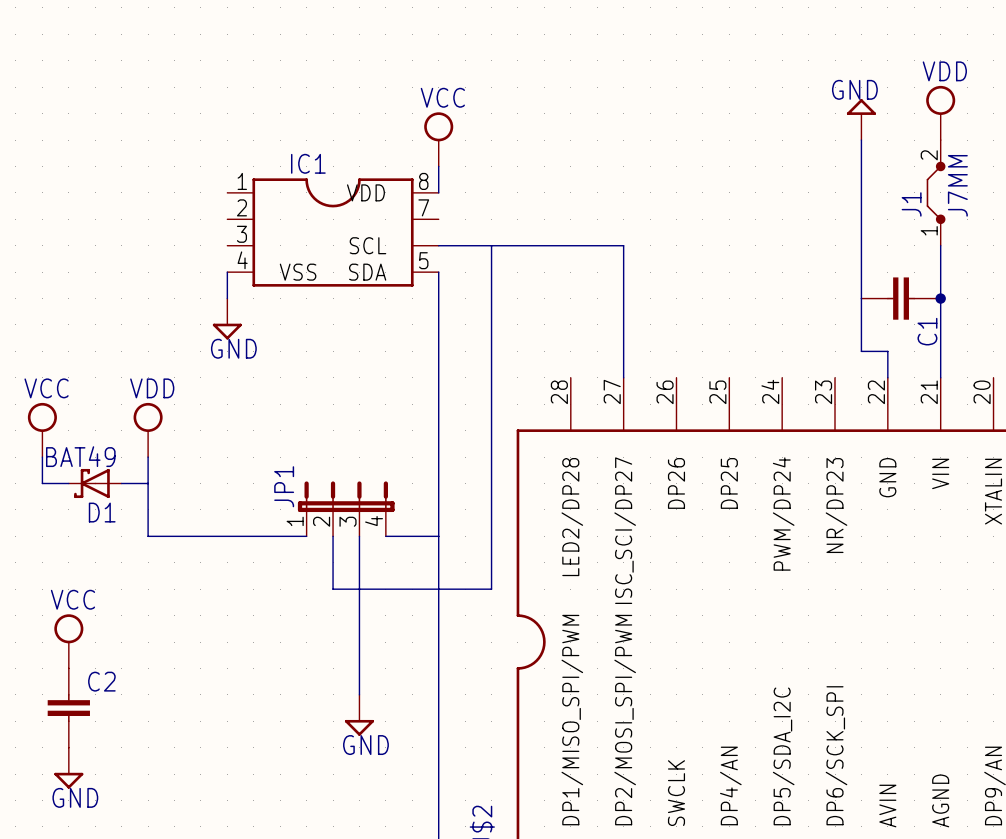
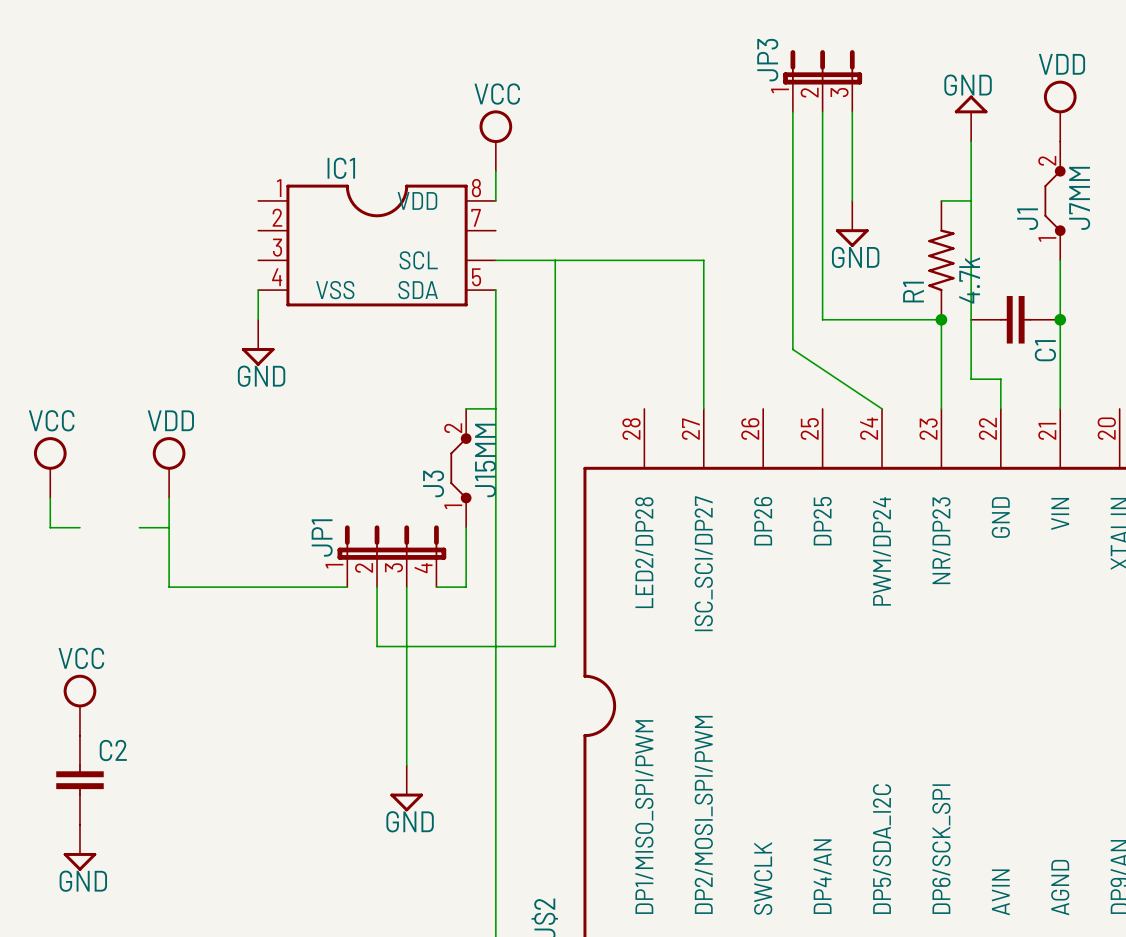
JP3: none -> (822, 80)
wire: none -> (792, 111) (792, 349) (882, 408)
wire: none -> (822, 111) (822, 319) (941, 319) (941, 408)
wire: none -> (852, 111) (852, 200)
wire: none -> (941, 200) (971, 200)
power symbol: none -> GND (852, 223)
R1: none -> 4.7k (941, 260)
junction: none -> (941, 319)
wire: none -> (466, 408) (495, 408)
J3: none -> J15MM (460, 468)
D1: BAT49 (95, 483) -> none
wire: (412, 536) (438, 536) -> (466, 587) (466, 527)

